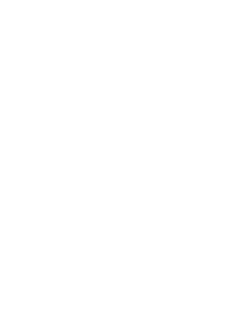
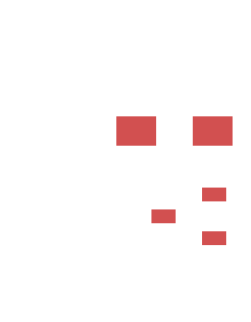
part: none -> (174, 131)
part: none -> (188, 216)

